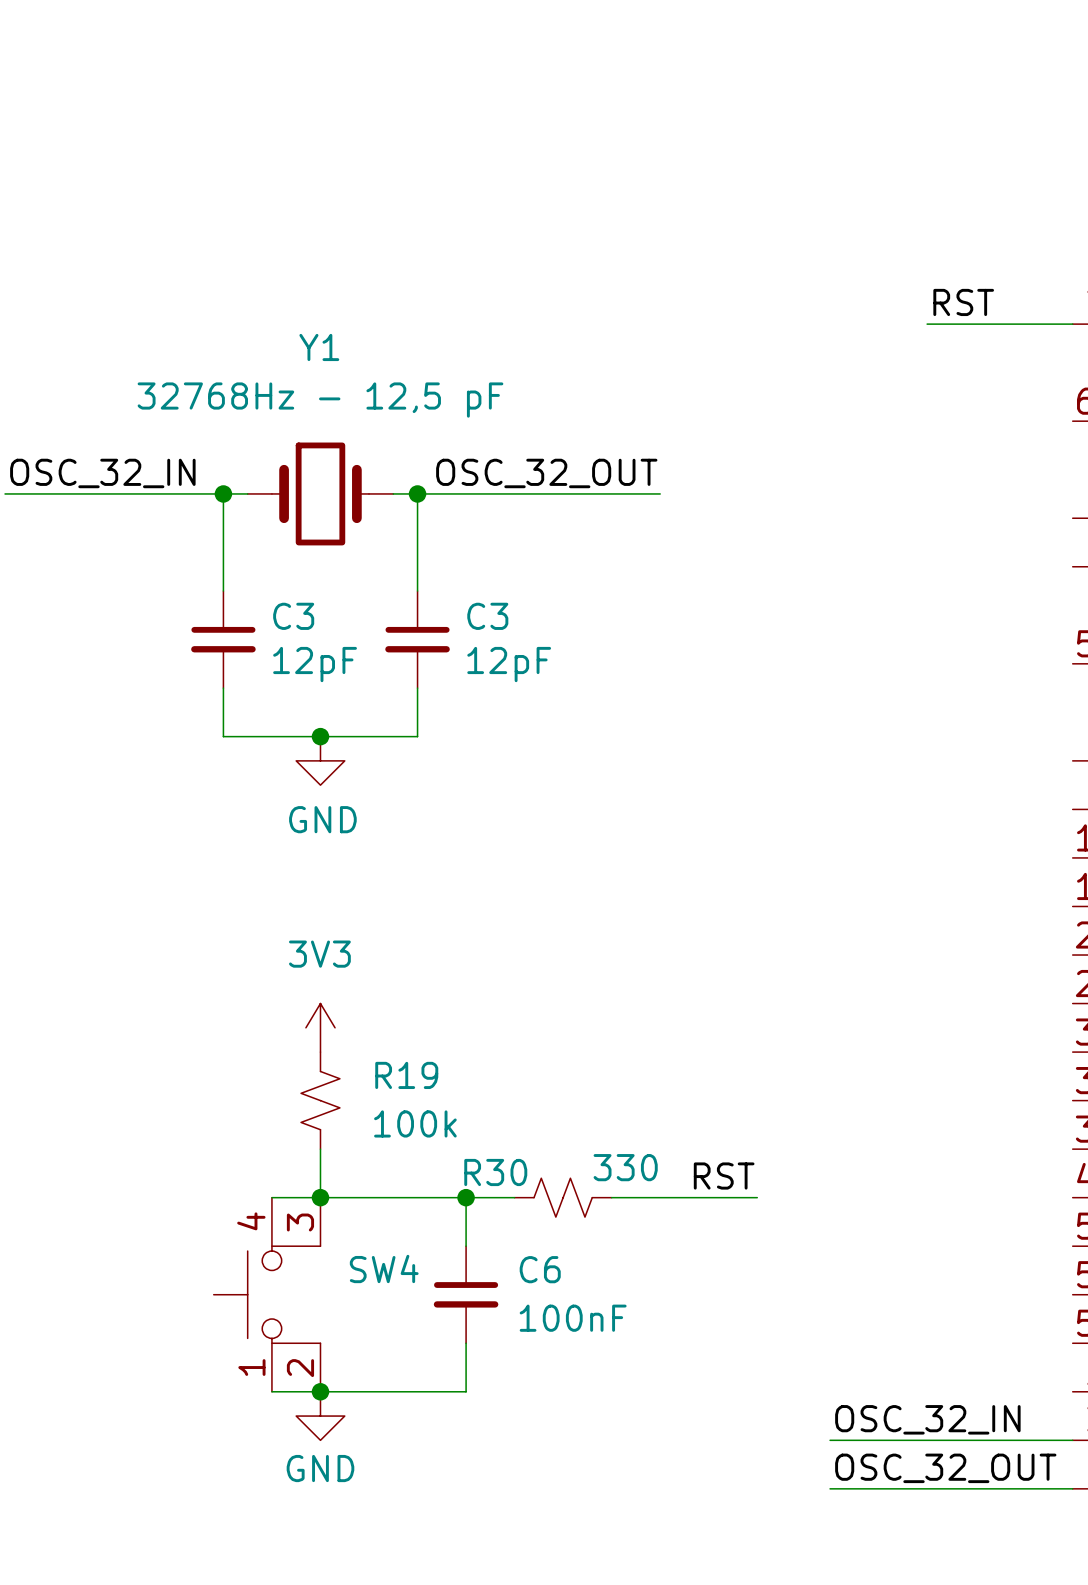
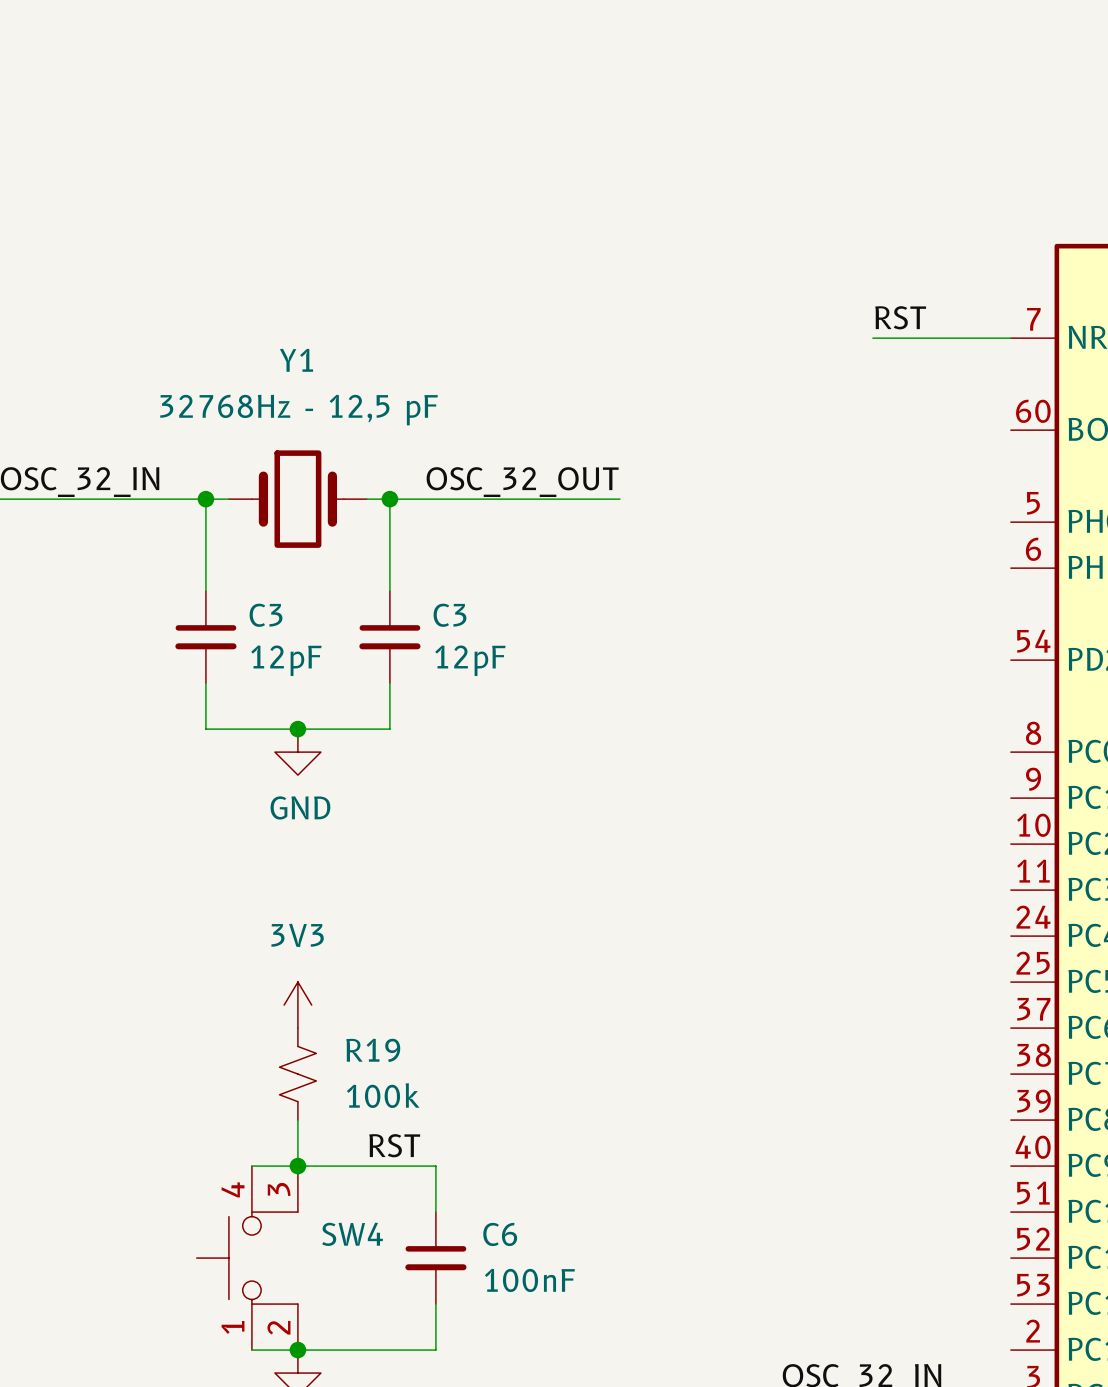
label position: RST (724, 1176) -> RST (394, 1145)
wire: (466, 1197) (514, 1197) -> none
junction: (466, 1197) -> none
R30: 330 (563, 1197) -> none
wire: (611, 1197) (757, 1197) -> none

